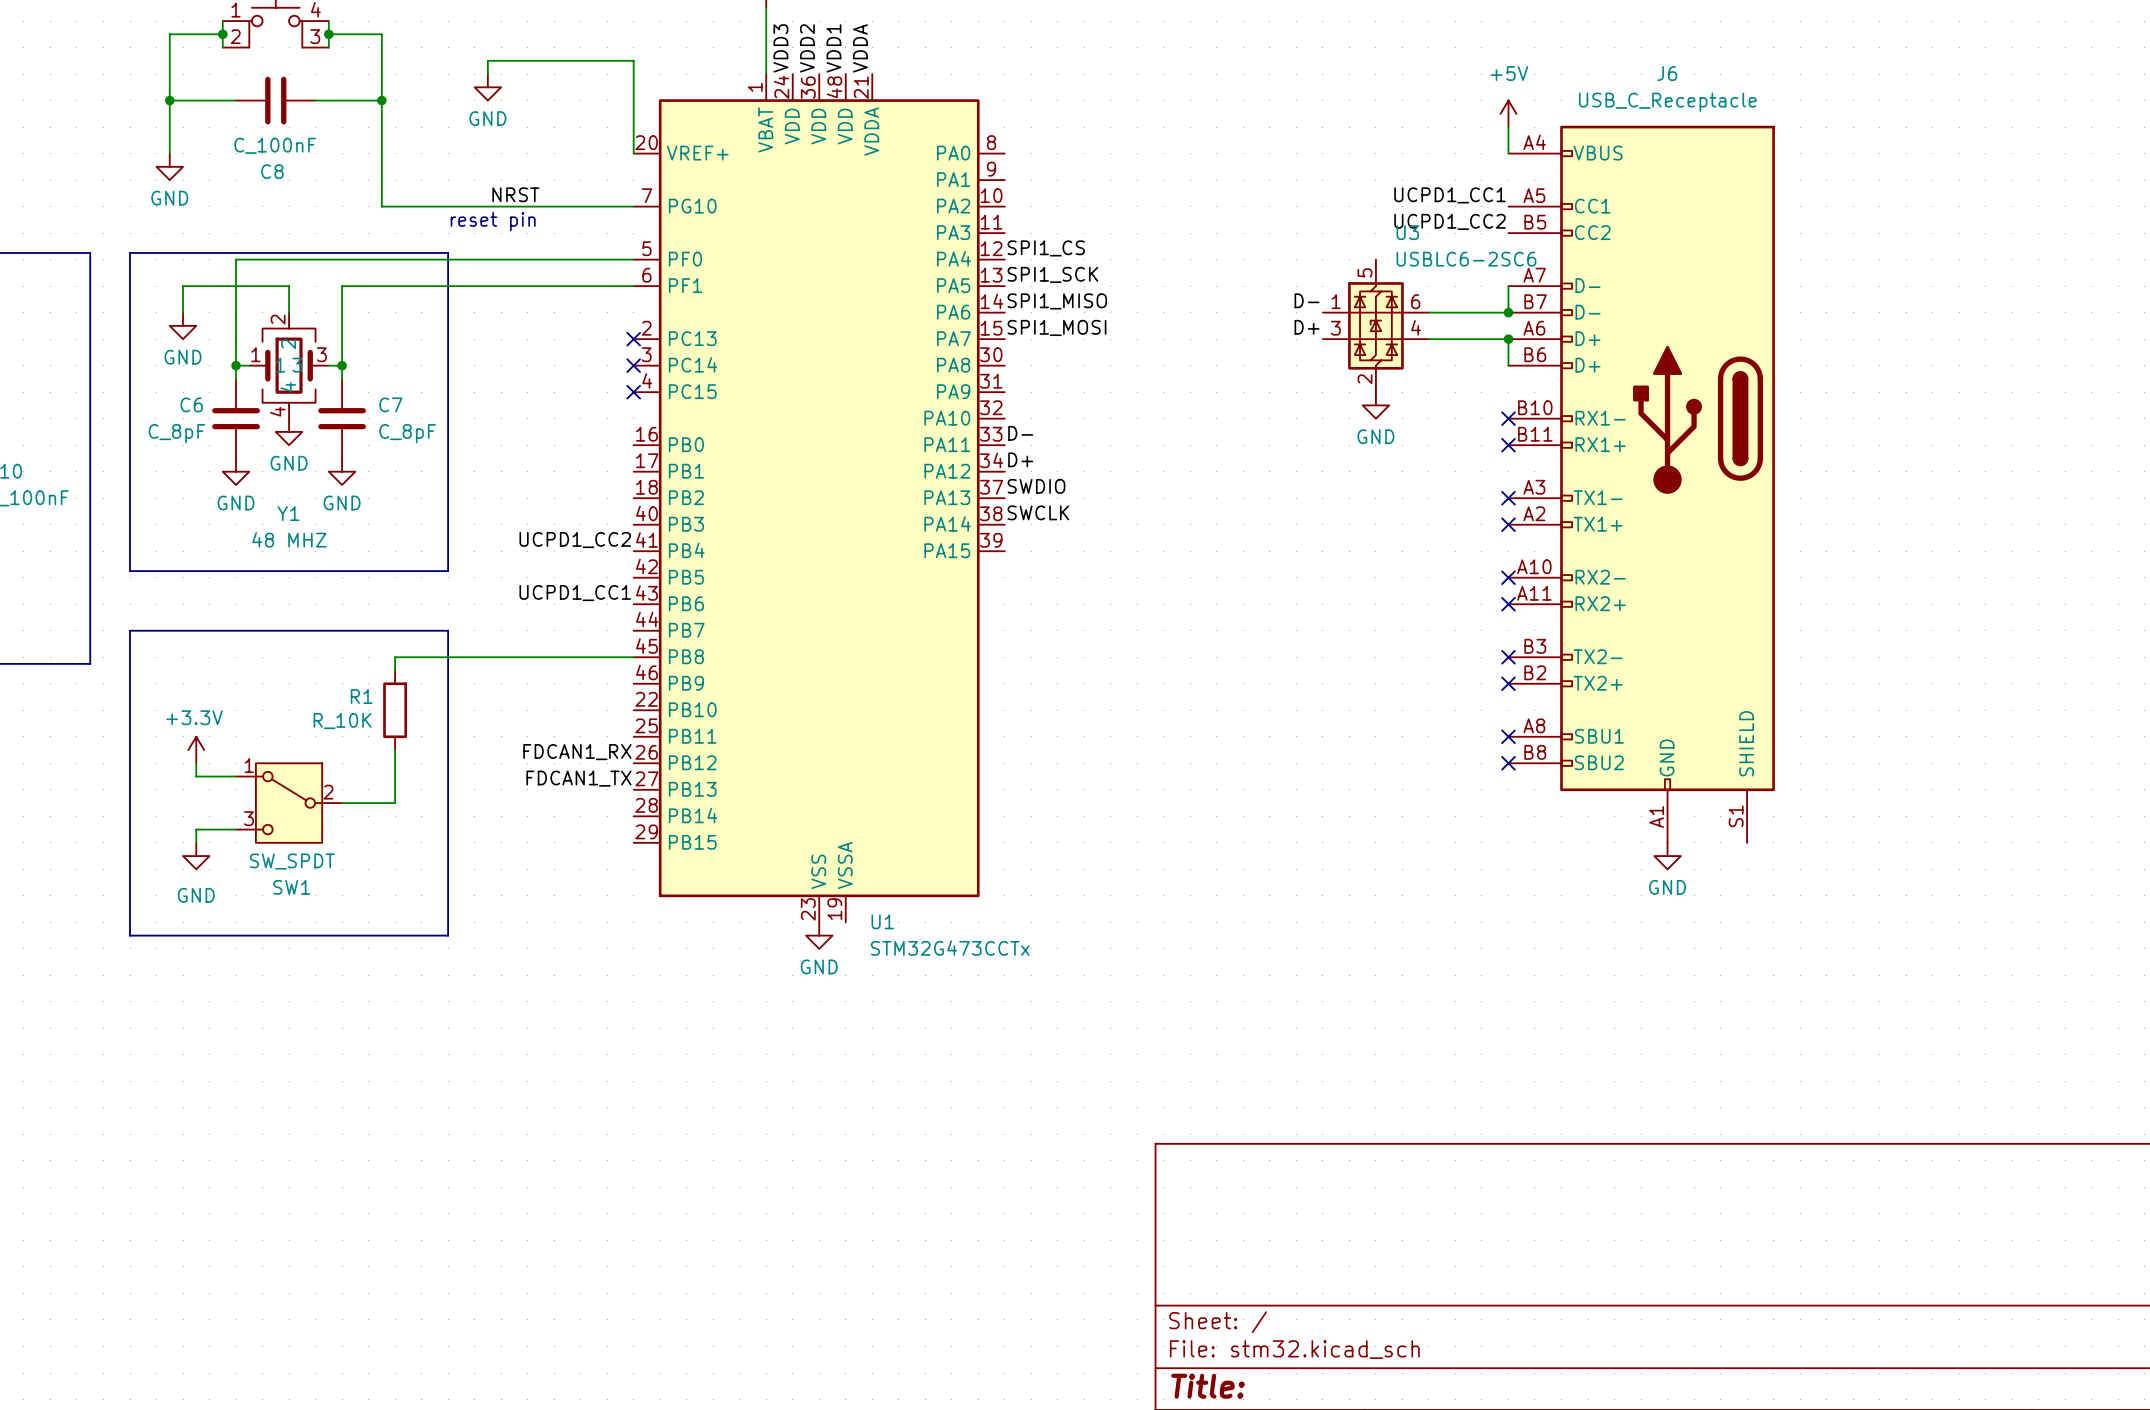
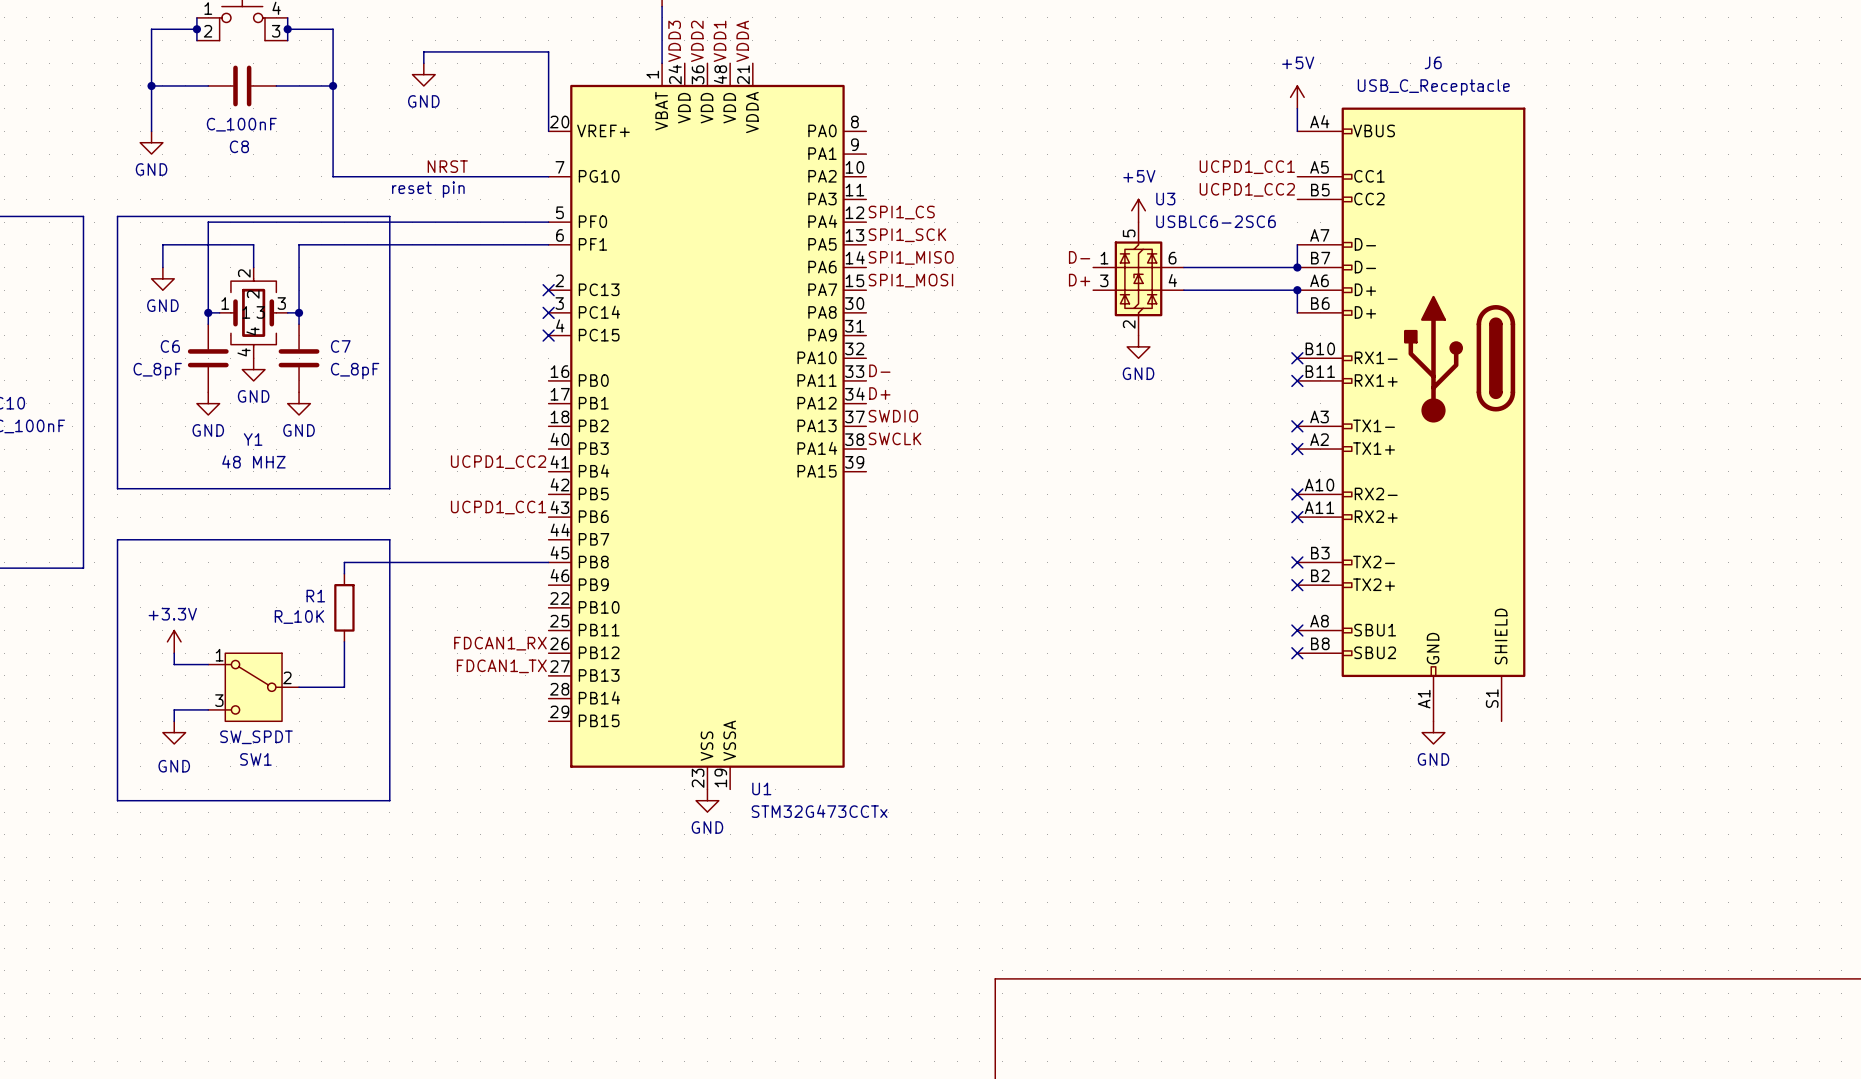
power symbol: none -> +5V (1138, 210)
label position: D- (1307, 300) -> D- (1079, 257)
U3 position: (1375, 325) -> (1138, 278)
label position: D+ (1307, 327) -> D+ (1079, 280)
power symbol position: GND (1375, 405) -> GND (1138, 346)

